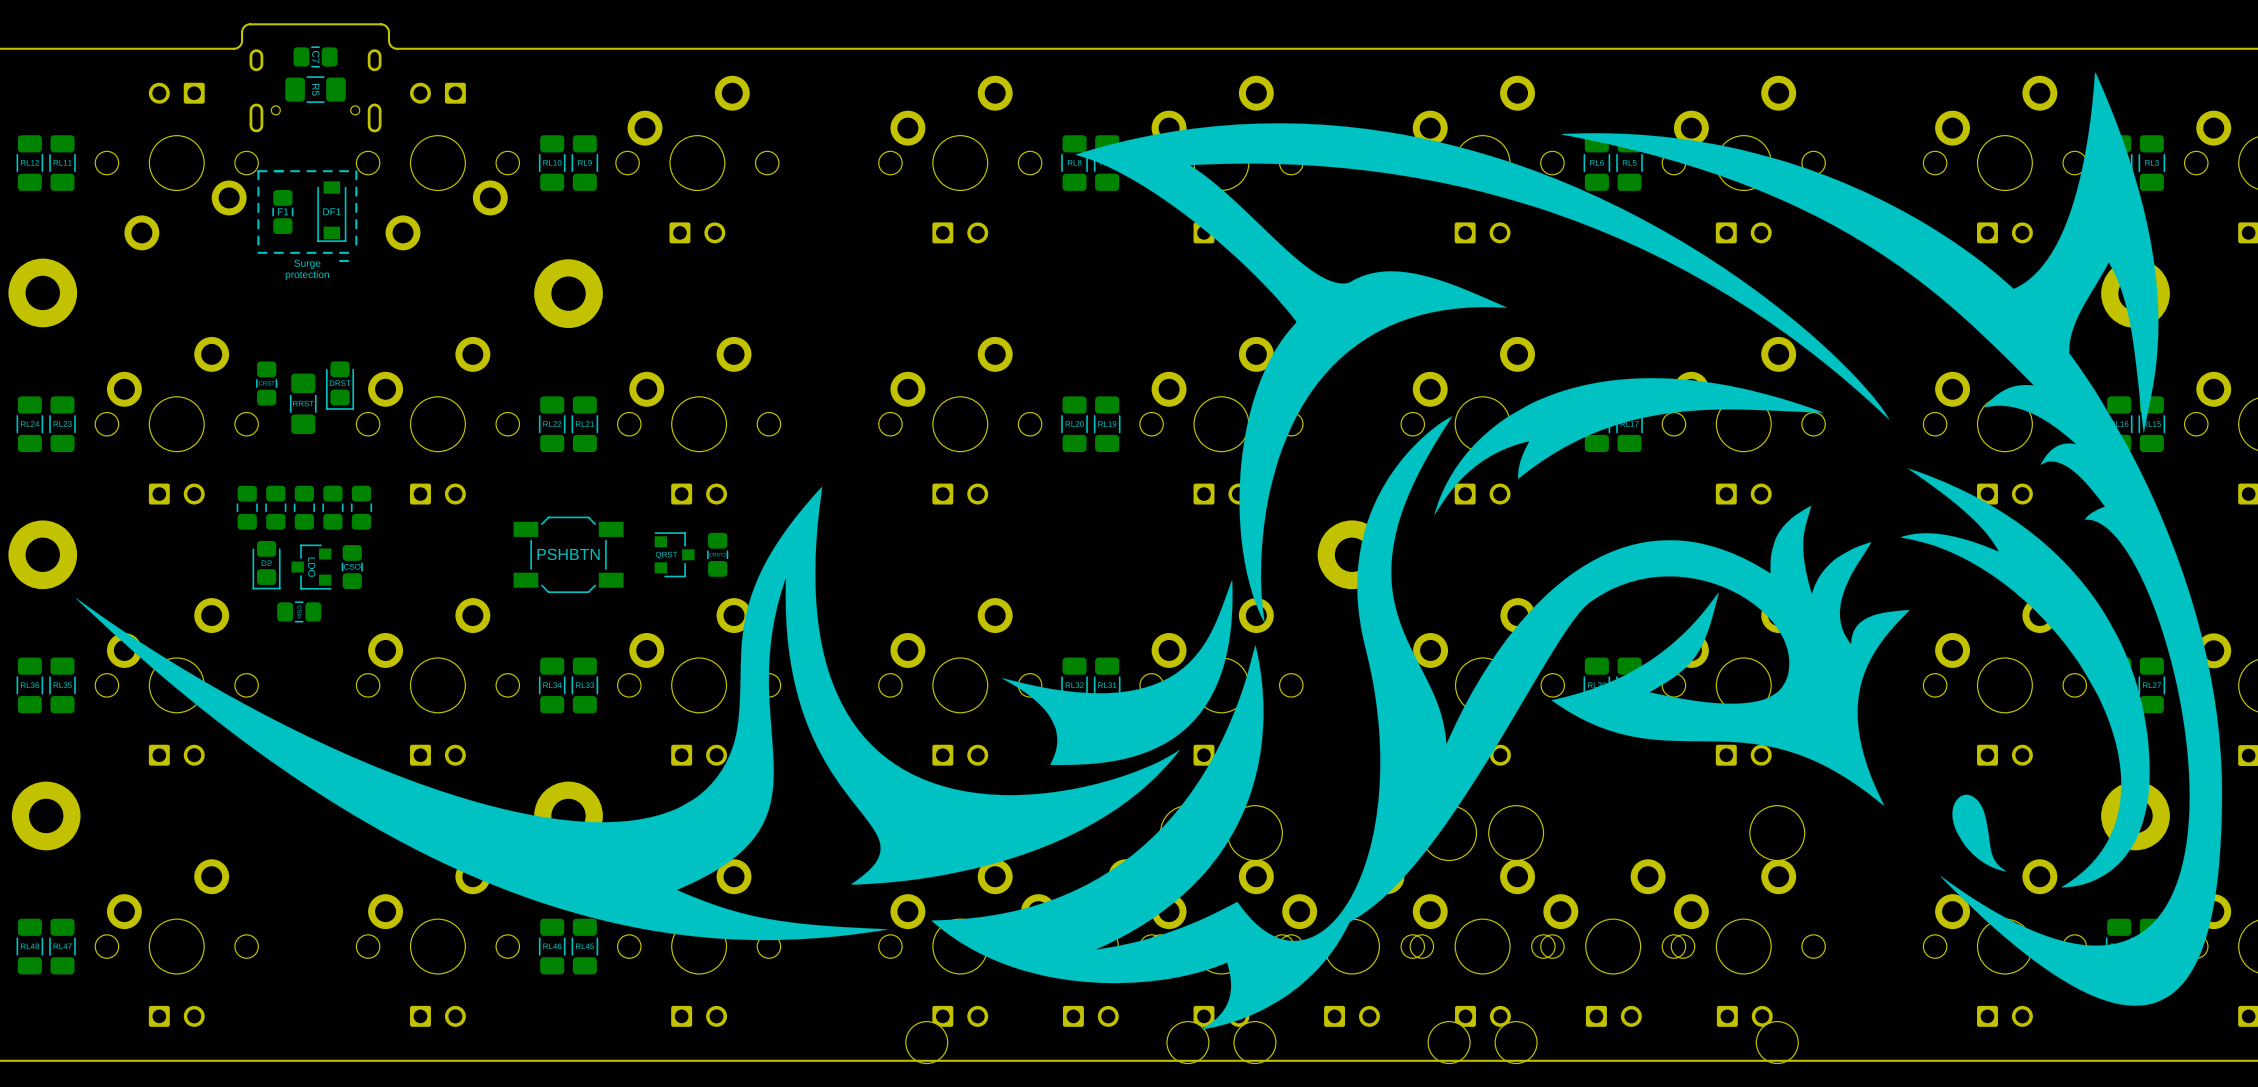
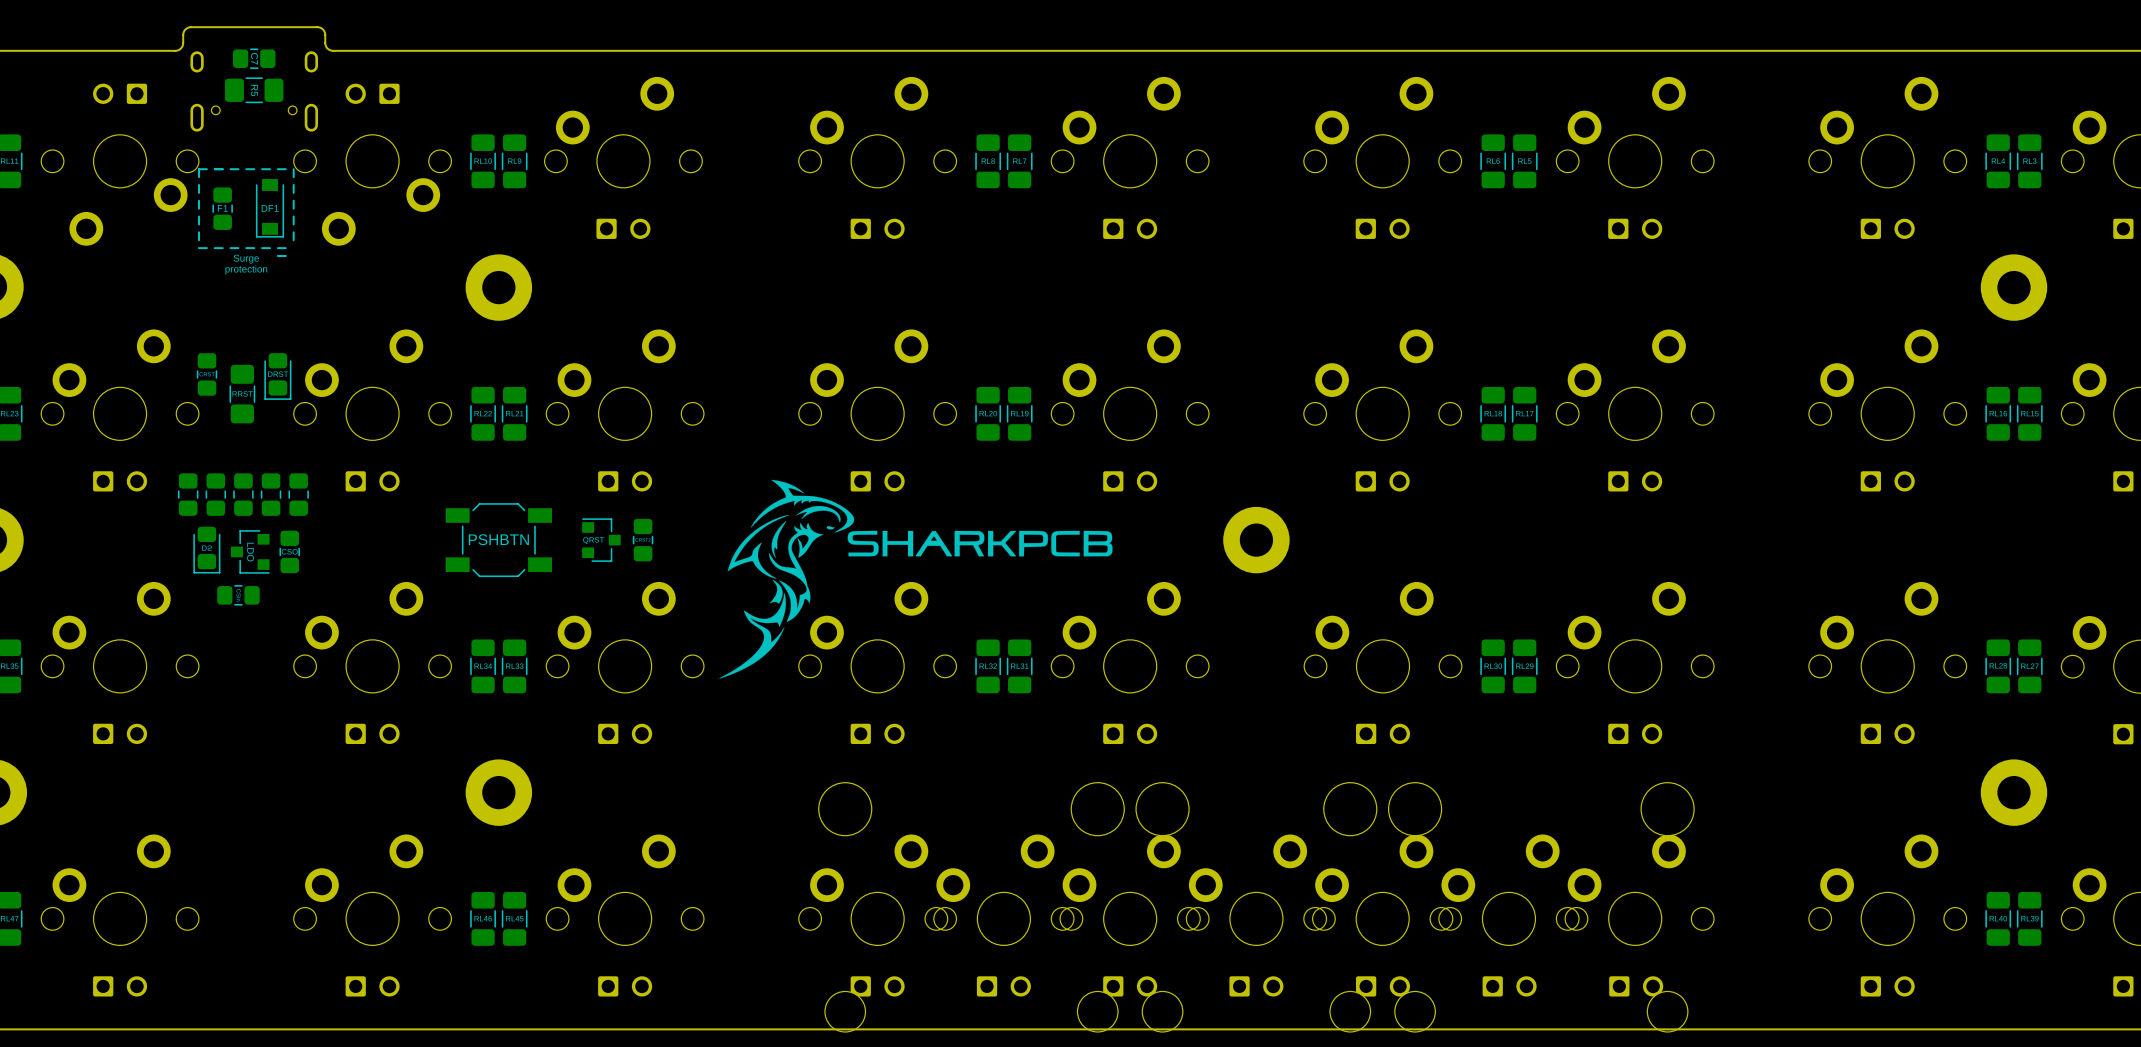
drawing: [76, 72, 2223, 1030] -> none
drawing: none -> [717, 479, 1113, 680]

